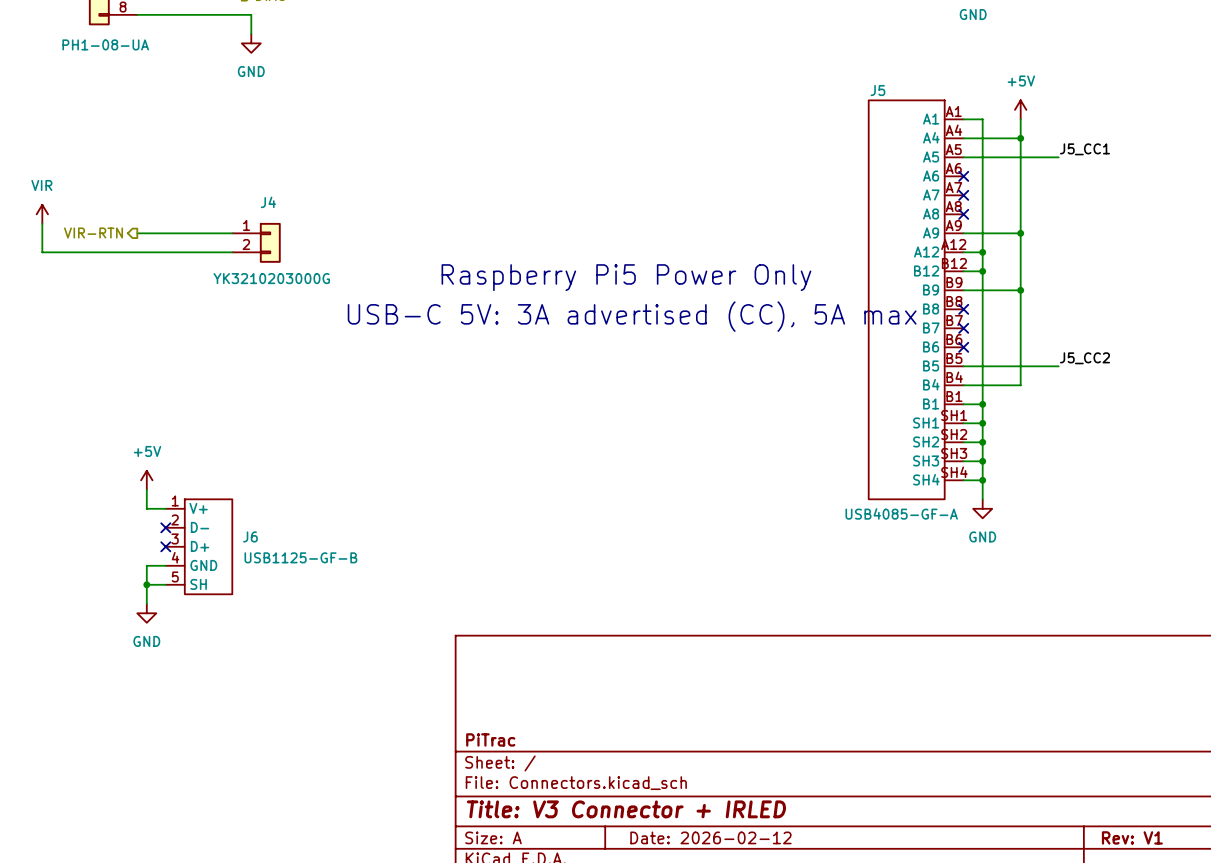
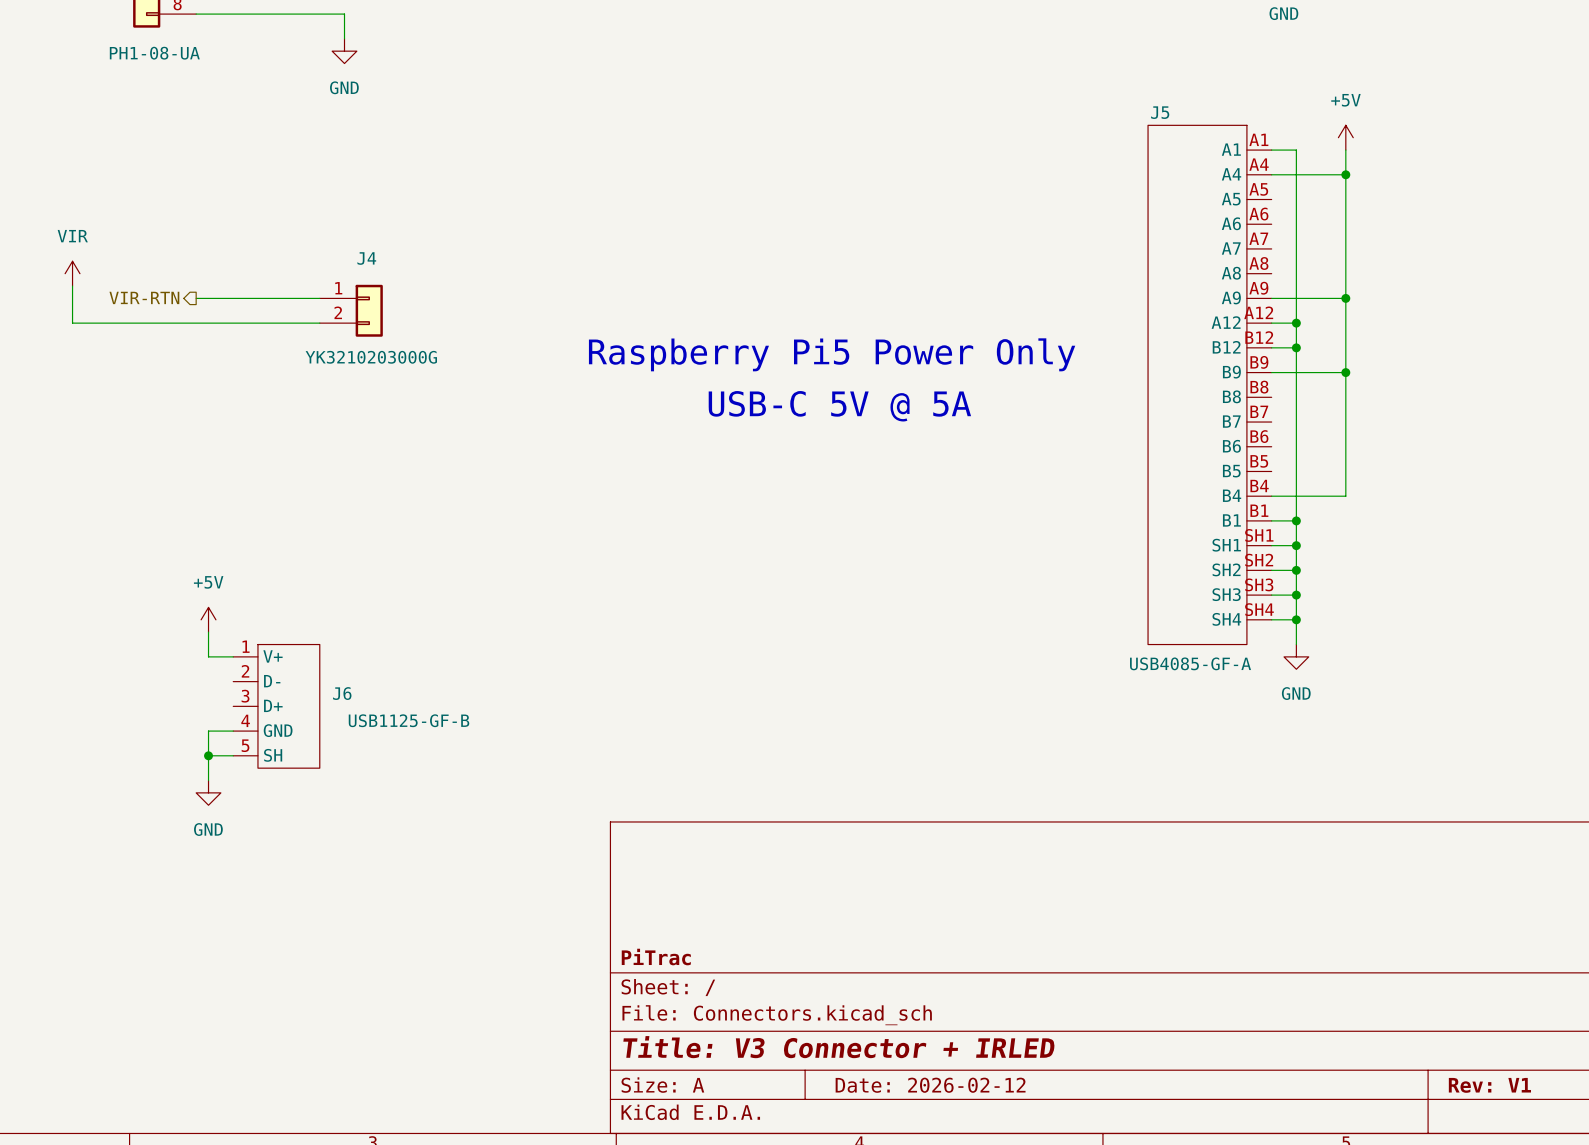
label: J5_CC1 (1084, 149) -> none
wire: (963, 157) (1058, 157) -> none
no-connect mark: (963, 176) -> none
no-connect mark: (963, 195) -> none
no-connect mark: (963, 214) -> none
no-connect mark: (963, 309) -> none
text: USB-C 5V: 3A advertised (CC), 5A max (632, 316) -> USB-C 5V @ 5A (839, 406)
no-connect mark: (963, 328) -> none
no-connect mark: (963, 347) -> none
label: J5_CC2 (1084, 358) -> none
wire: (963, 366) (1058, 366) -> none
no-connect mark: (165, 527) -> none
no-connect mark: (165, 546) -> none

